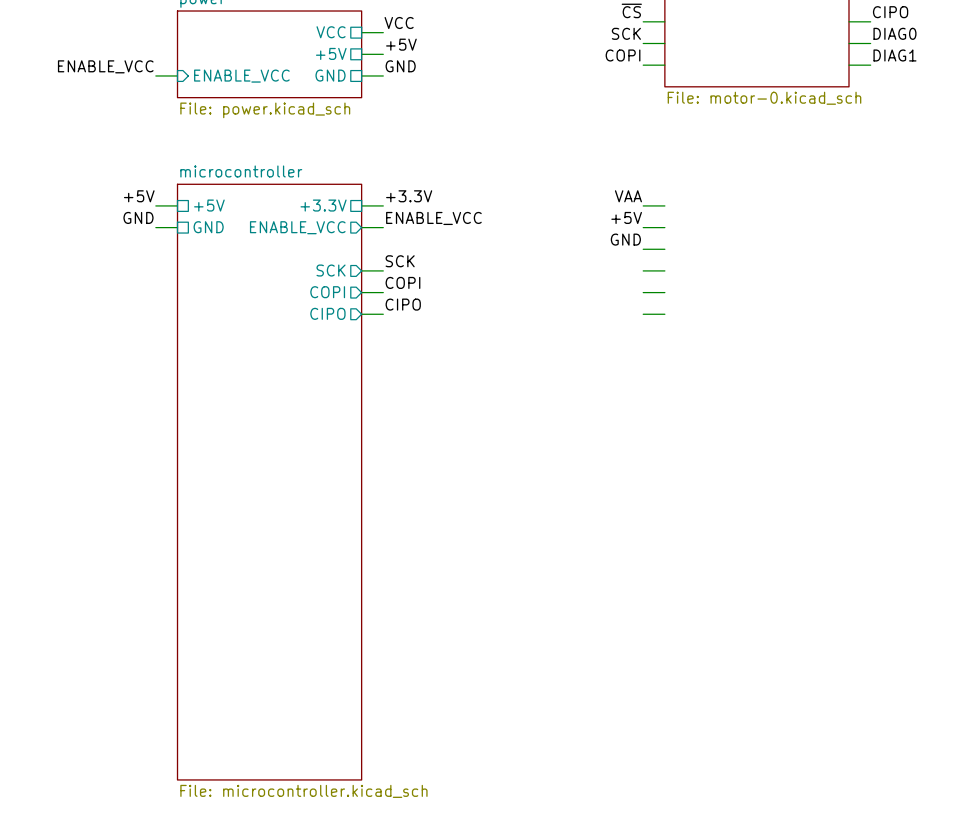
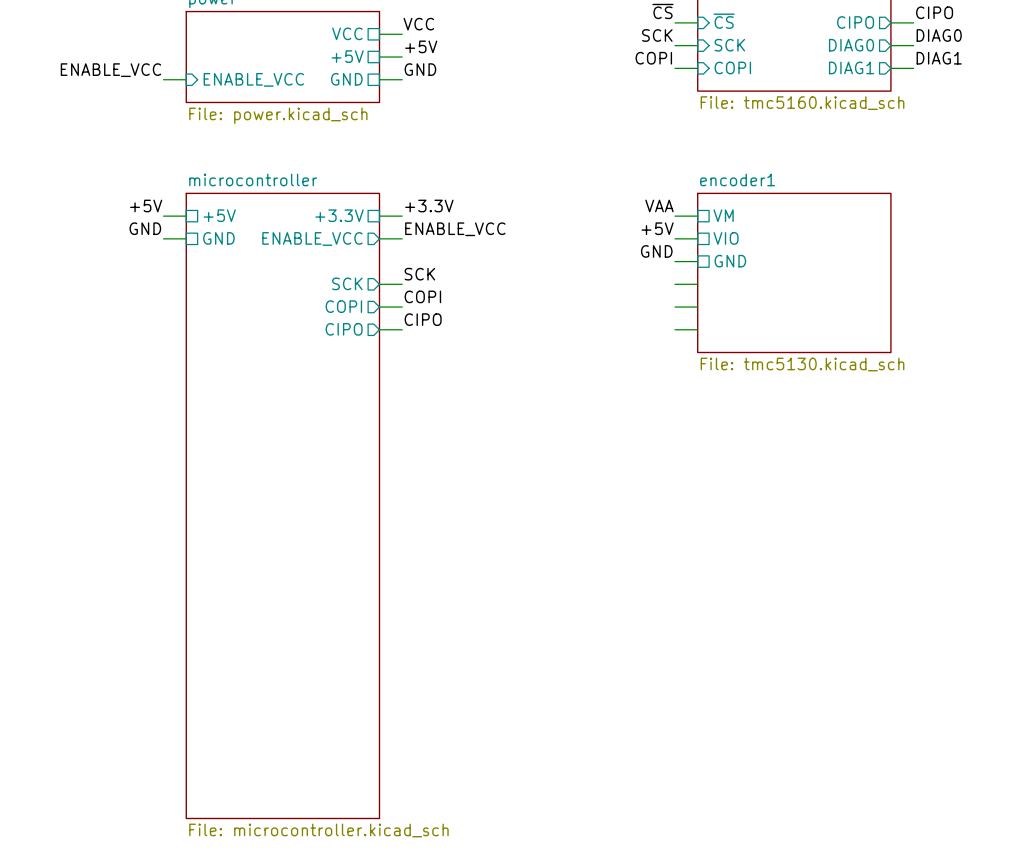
sheet pin: none -> ~{CS} (724, 21)
sheet pin: none -> CIPO (855, 22)
sheet pin: none -> SCK (729, 45)
sheet pin: none -> DIAG0 (851, 45)
sheet pin: none -> COPI (732, 67)
sheet pin: none -> DIAG1 (851, 67)
sheet value: File: motor-0.kicad_sch (764, 98) -> File: tmc5160.kicad_sch (802, 103)
sheet pin: none -> VM (723, 215)
sheet pin: none -> VIO (726, 238)
sheet pin: none -> GND (730, 261)
sheet encoder1: none -> File: tmc5130.kicad_sch (794, 272)

